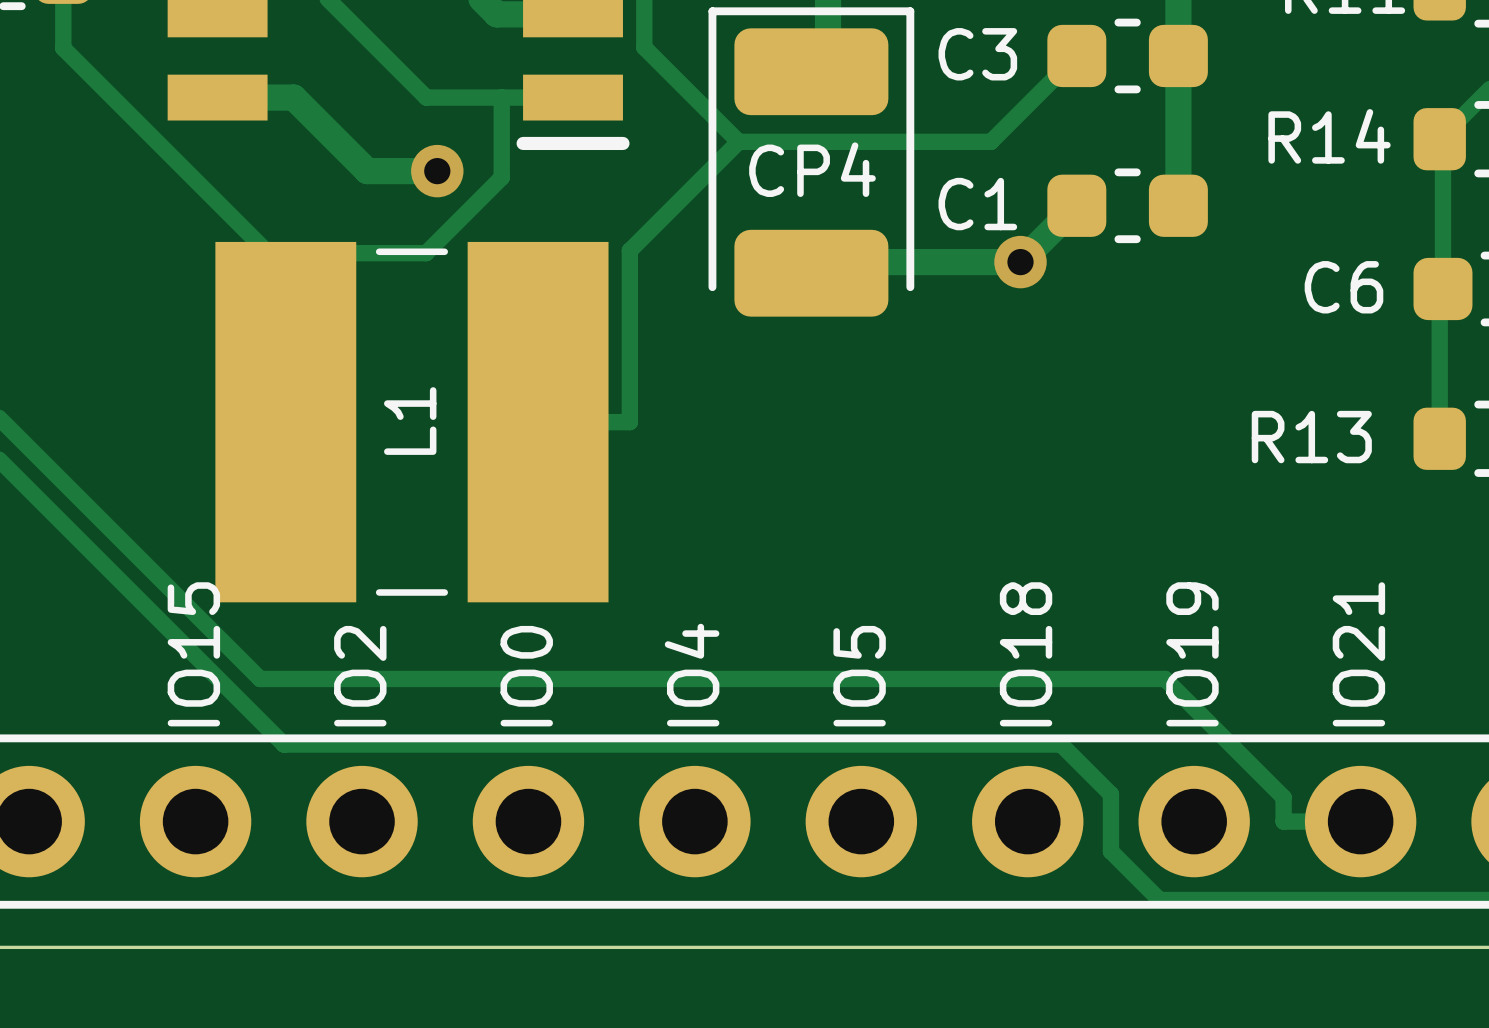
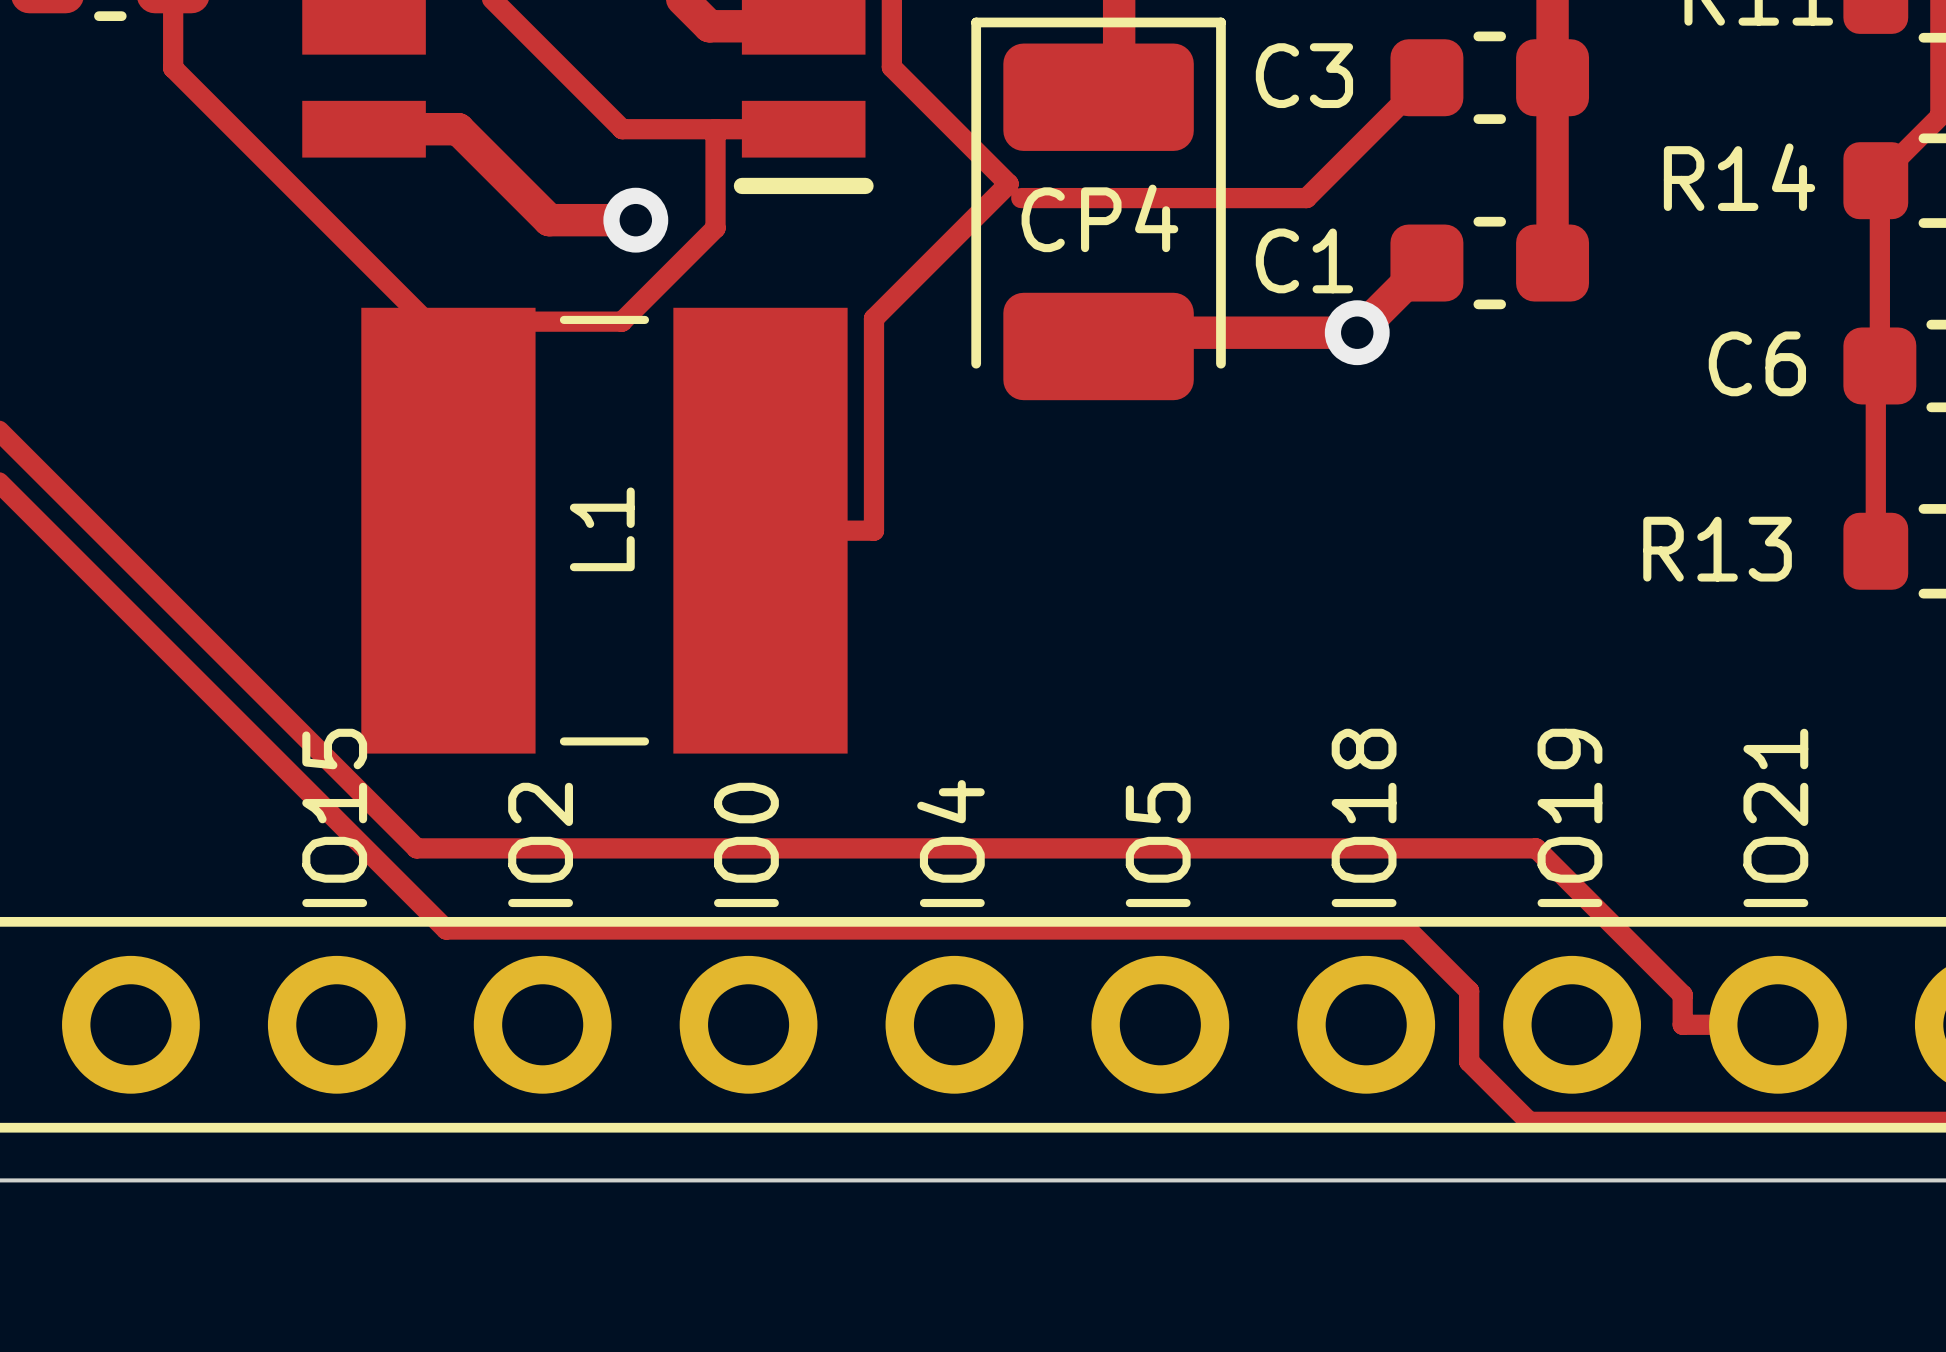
track: (738, 141) (990, 141) -> (1021, 198) (1306, 198) (1320, 183)

